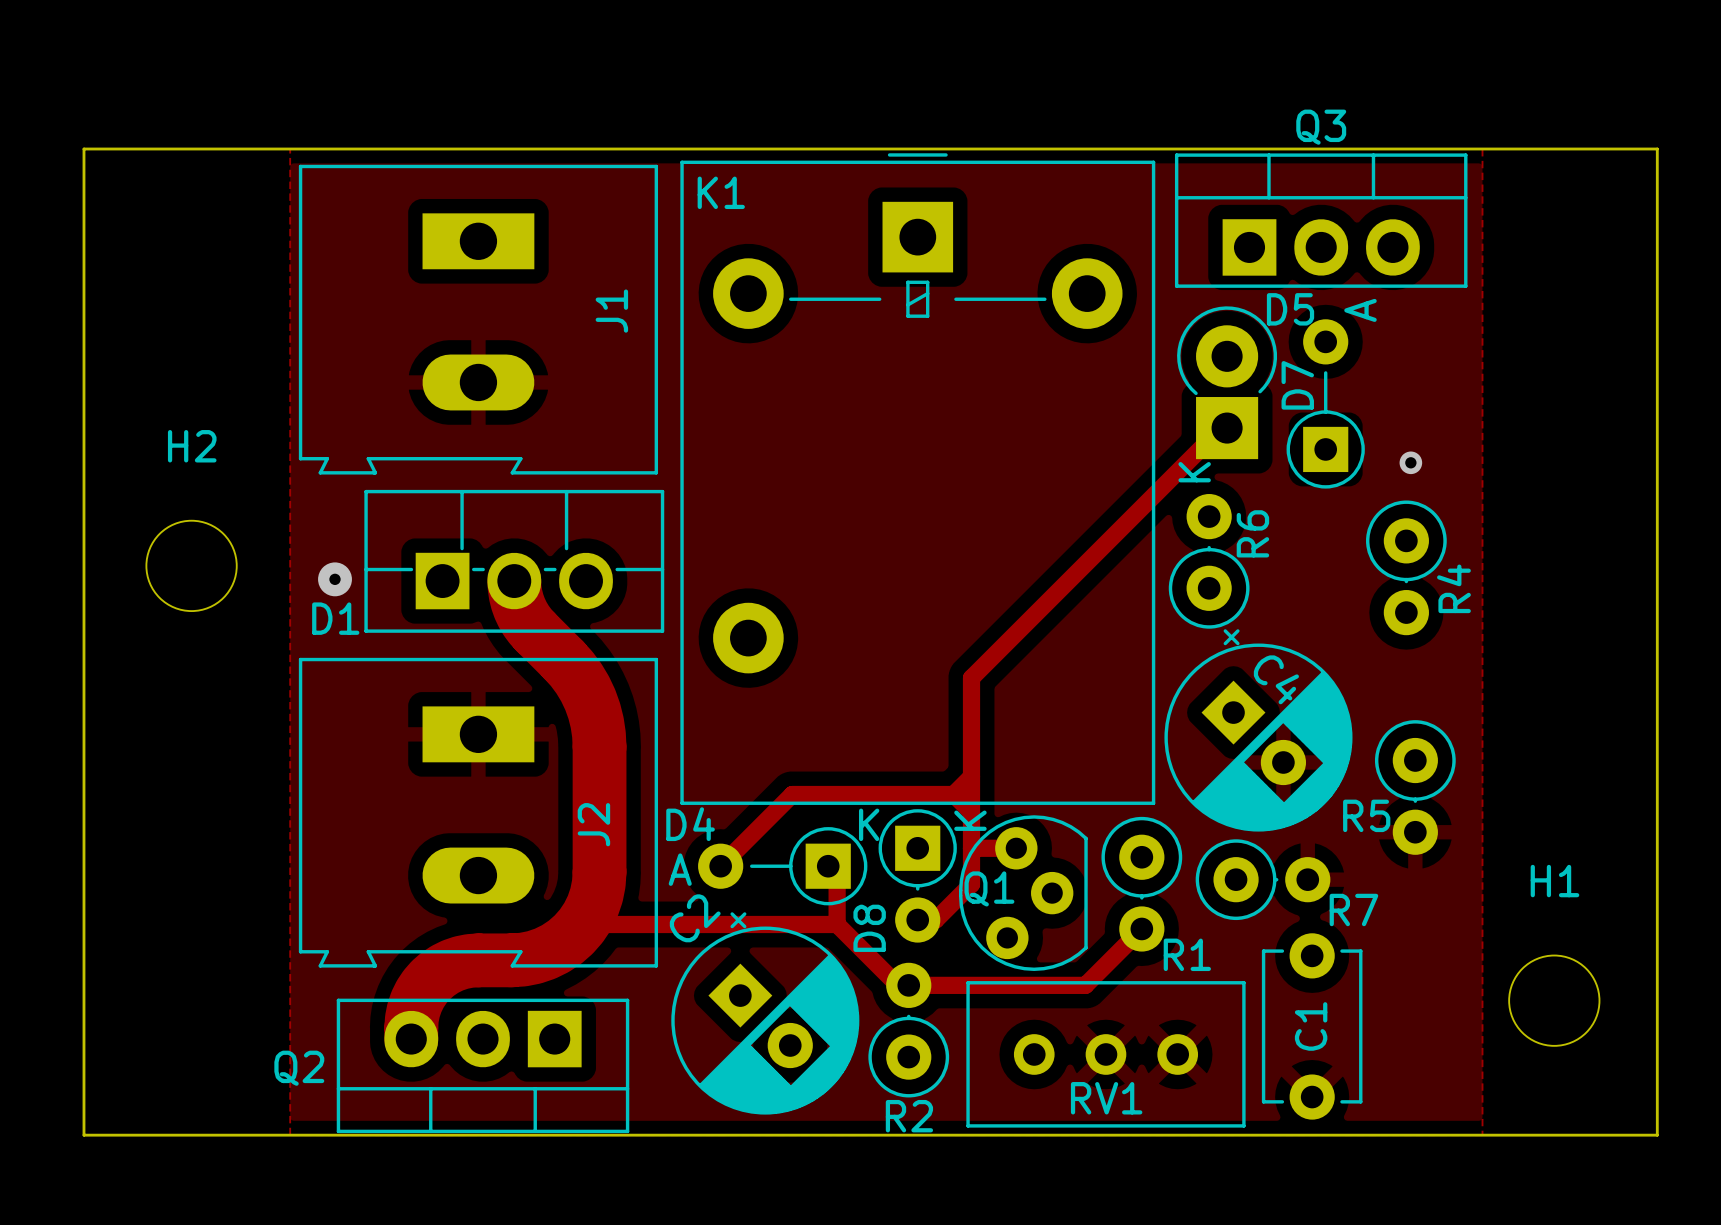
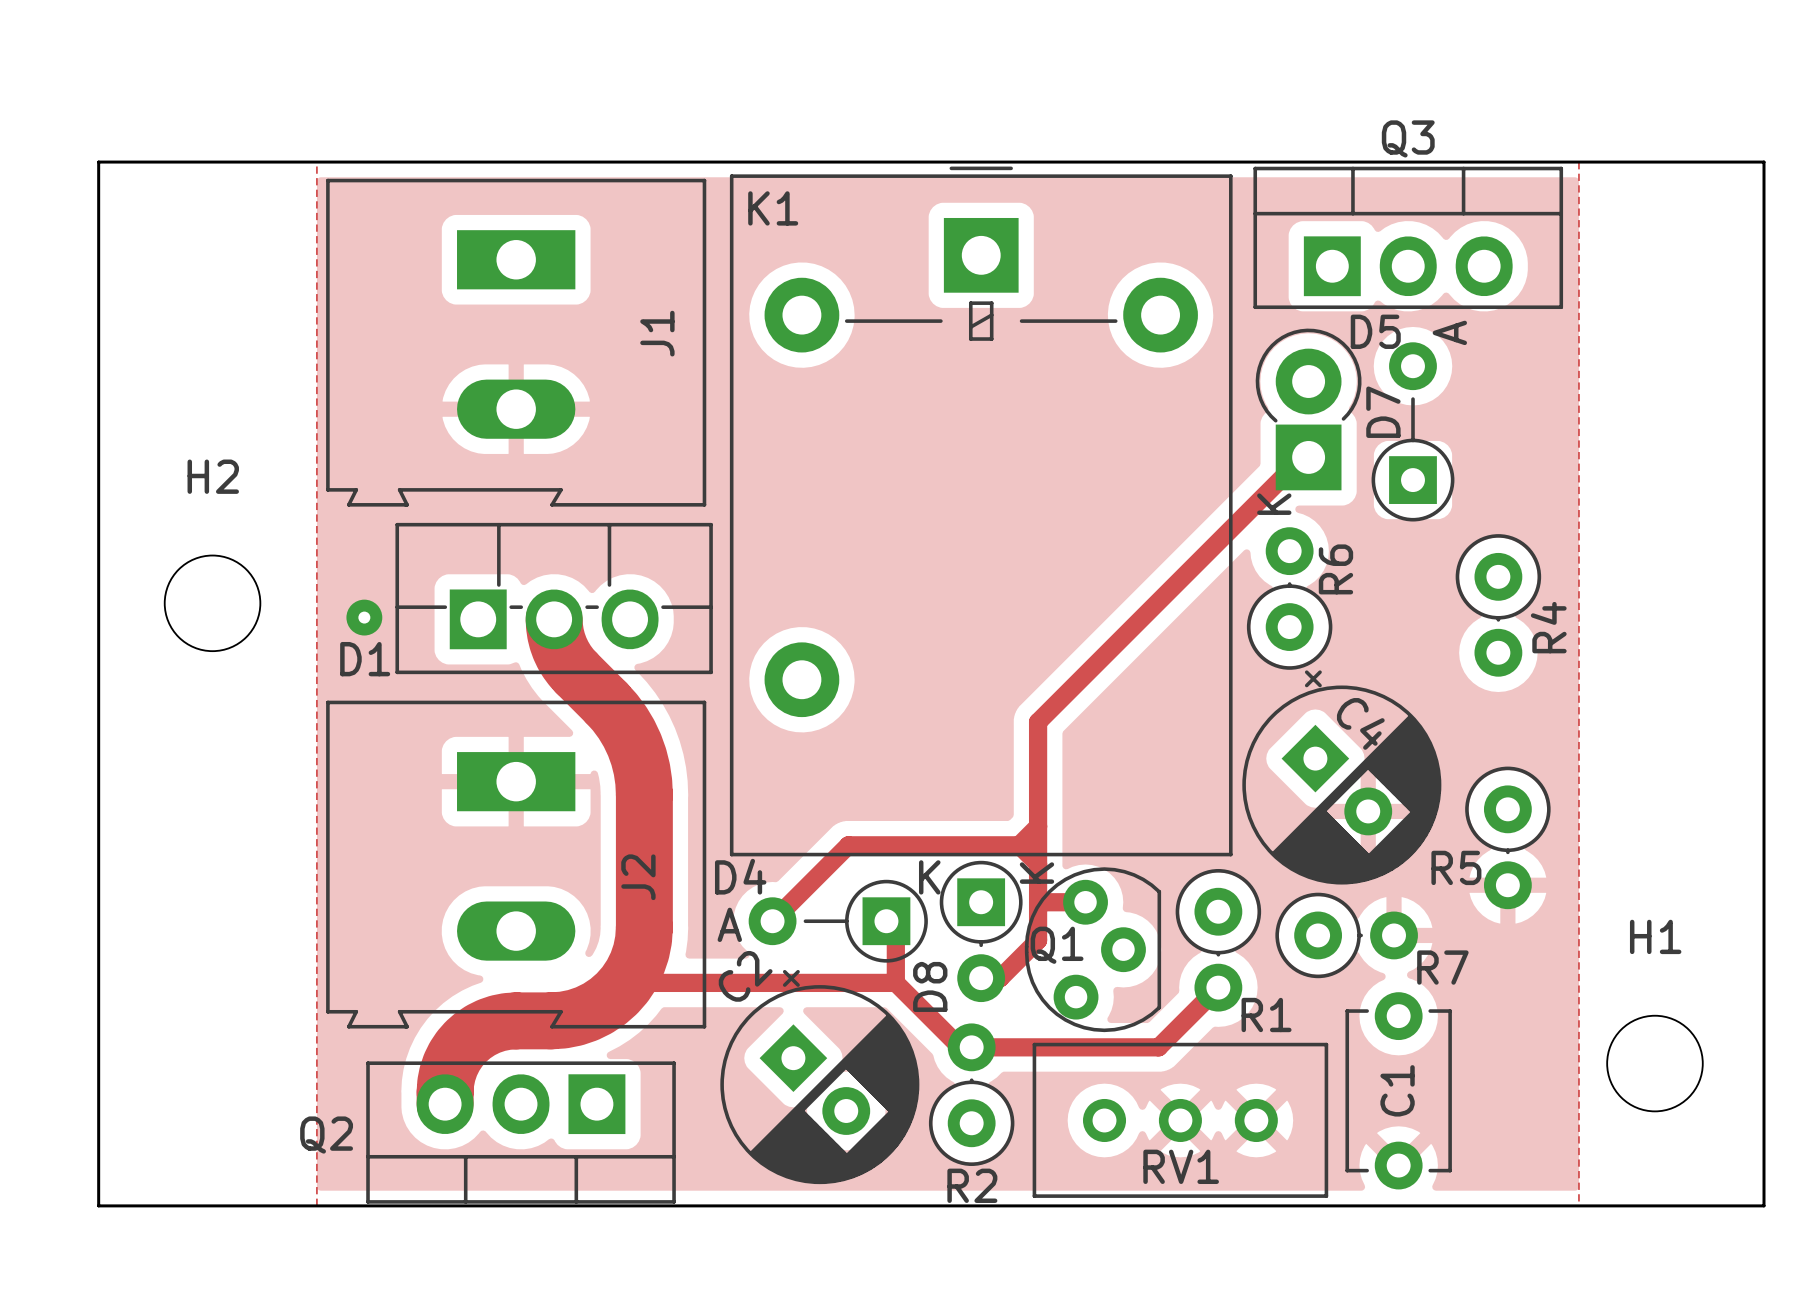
via: (1410, 462) -> none

